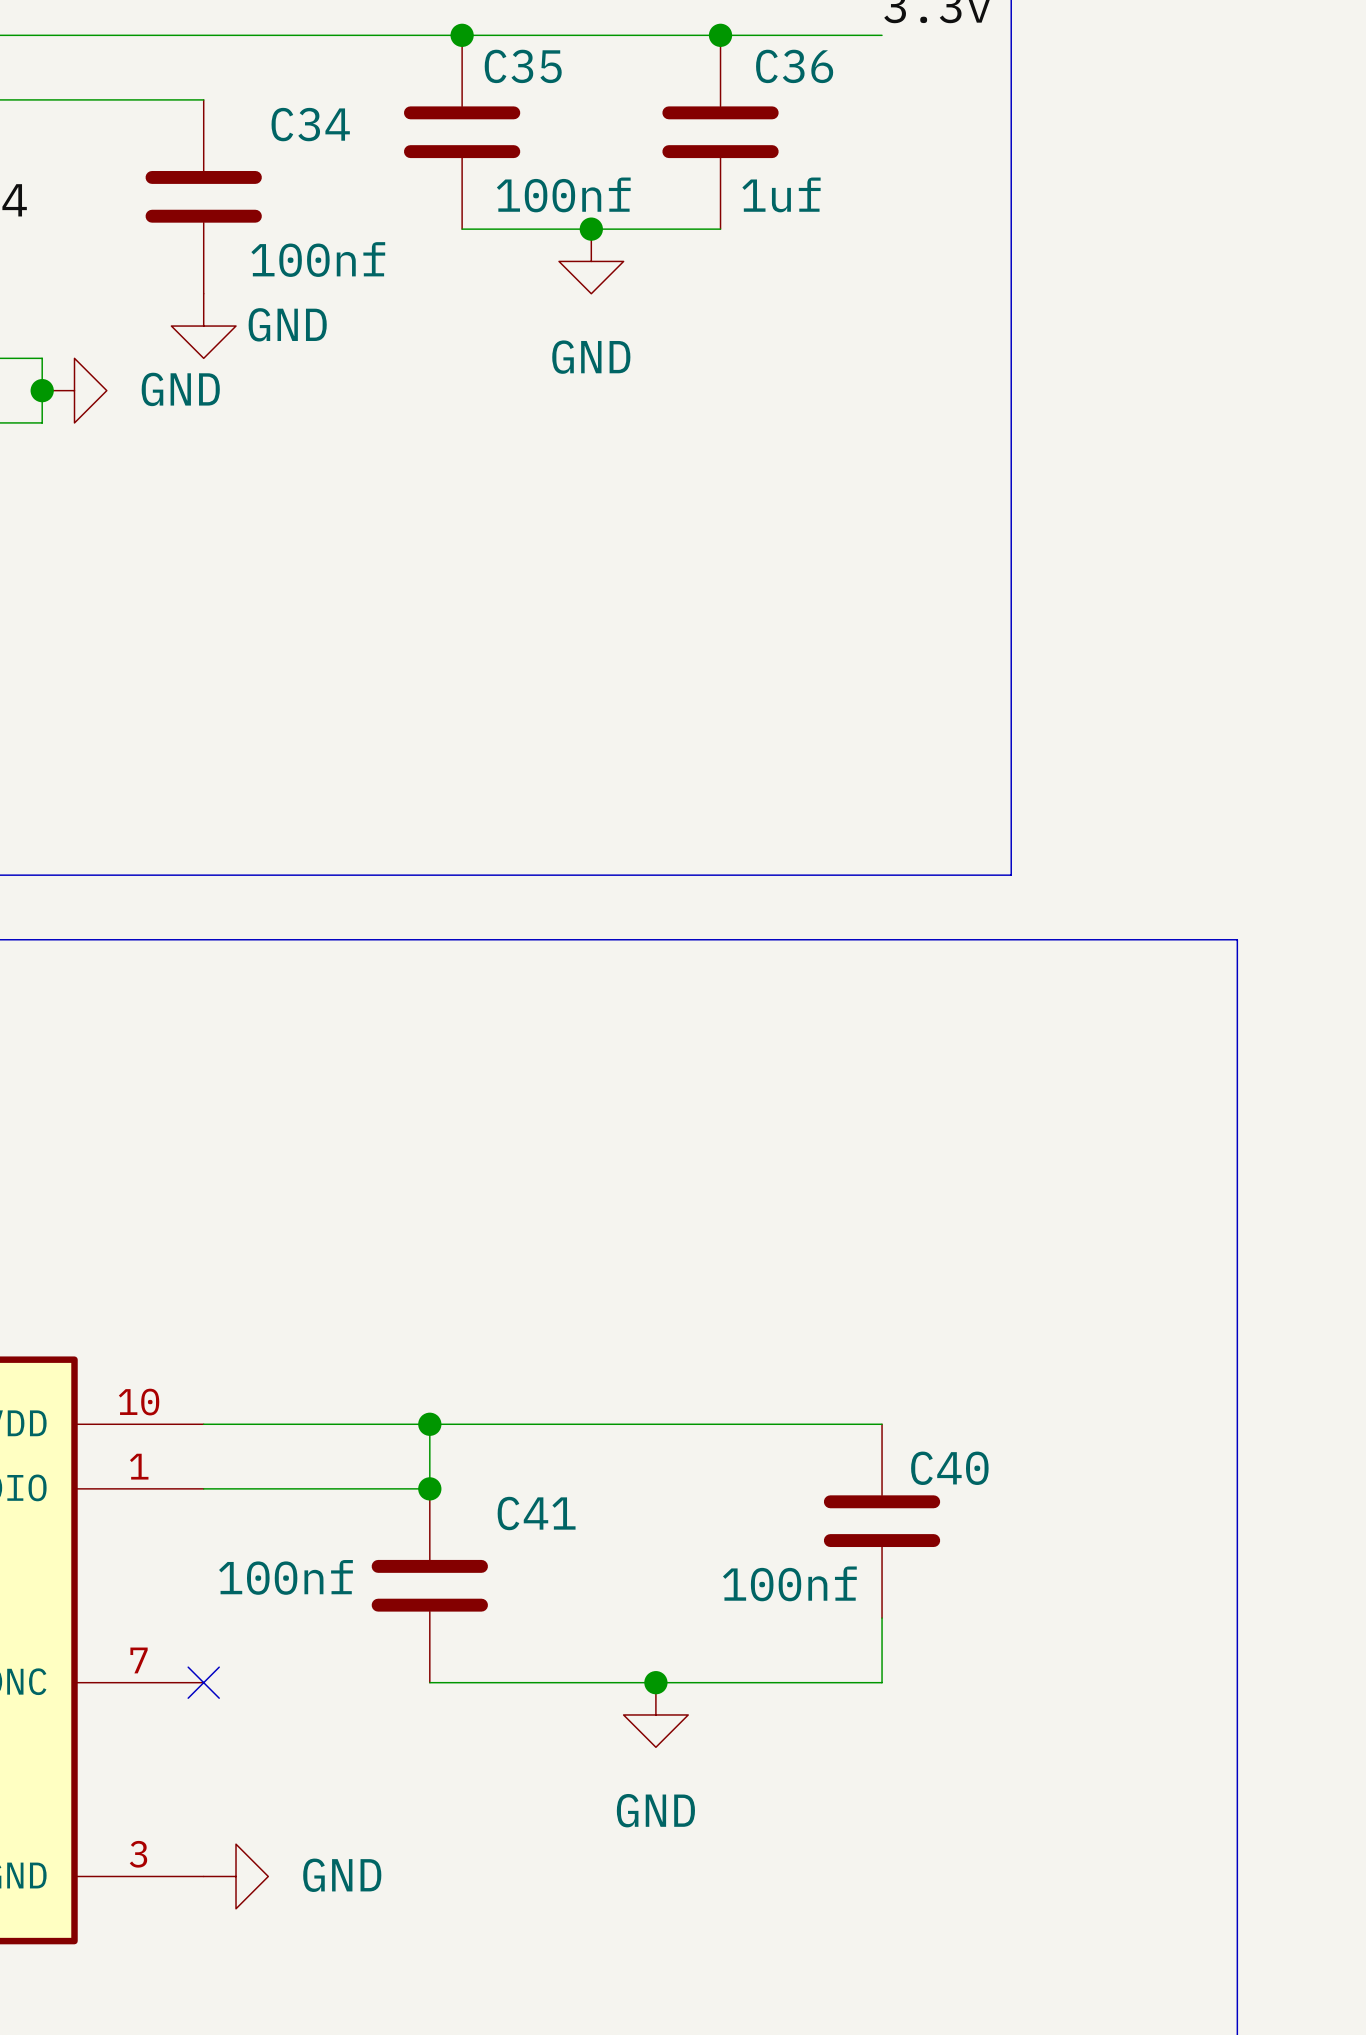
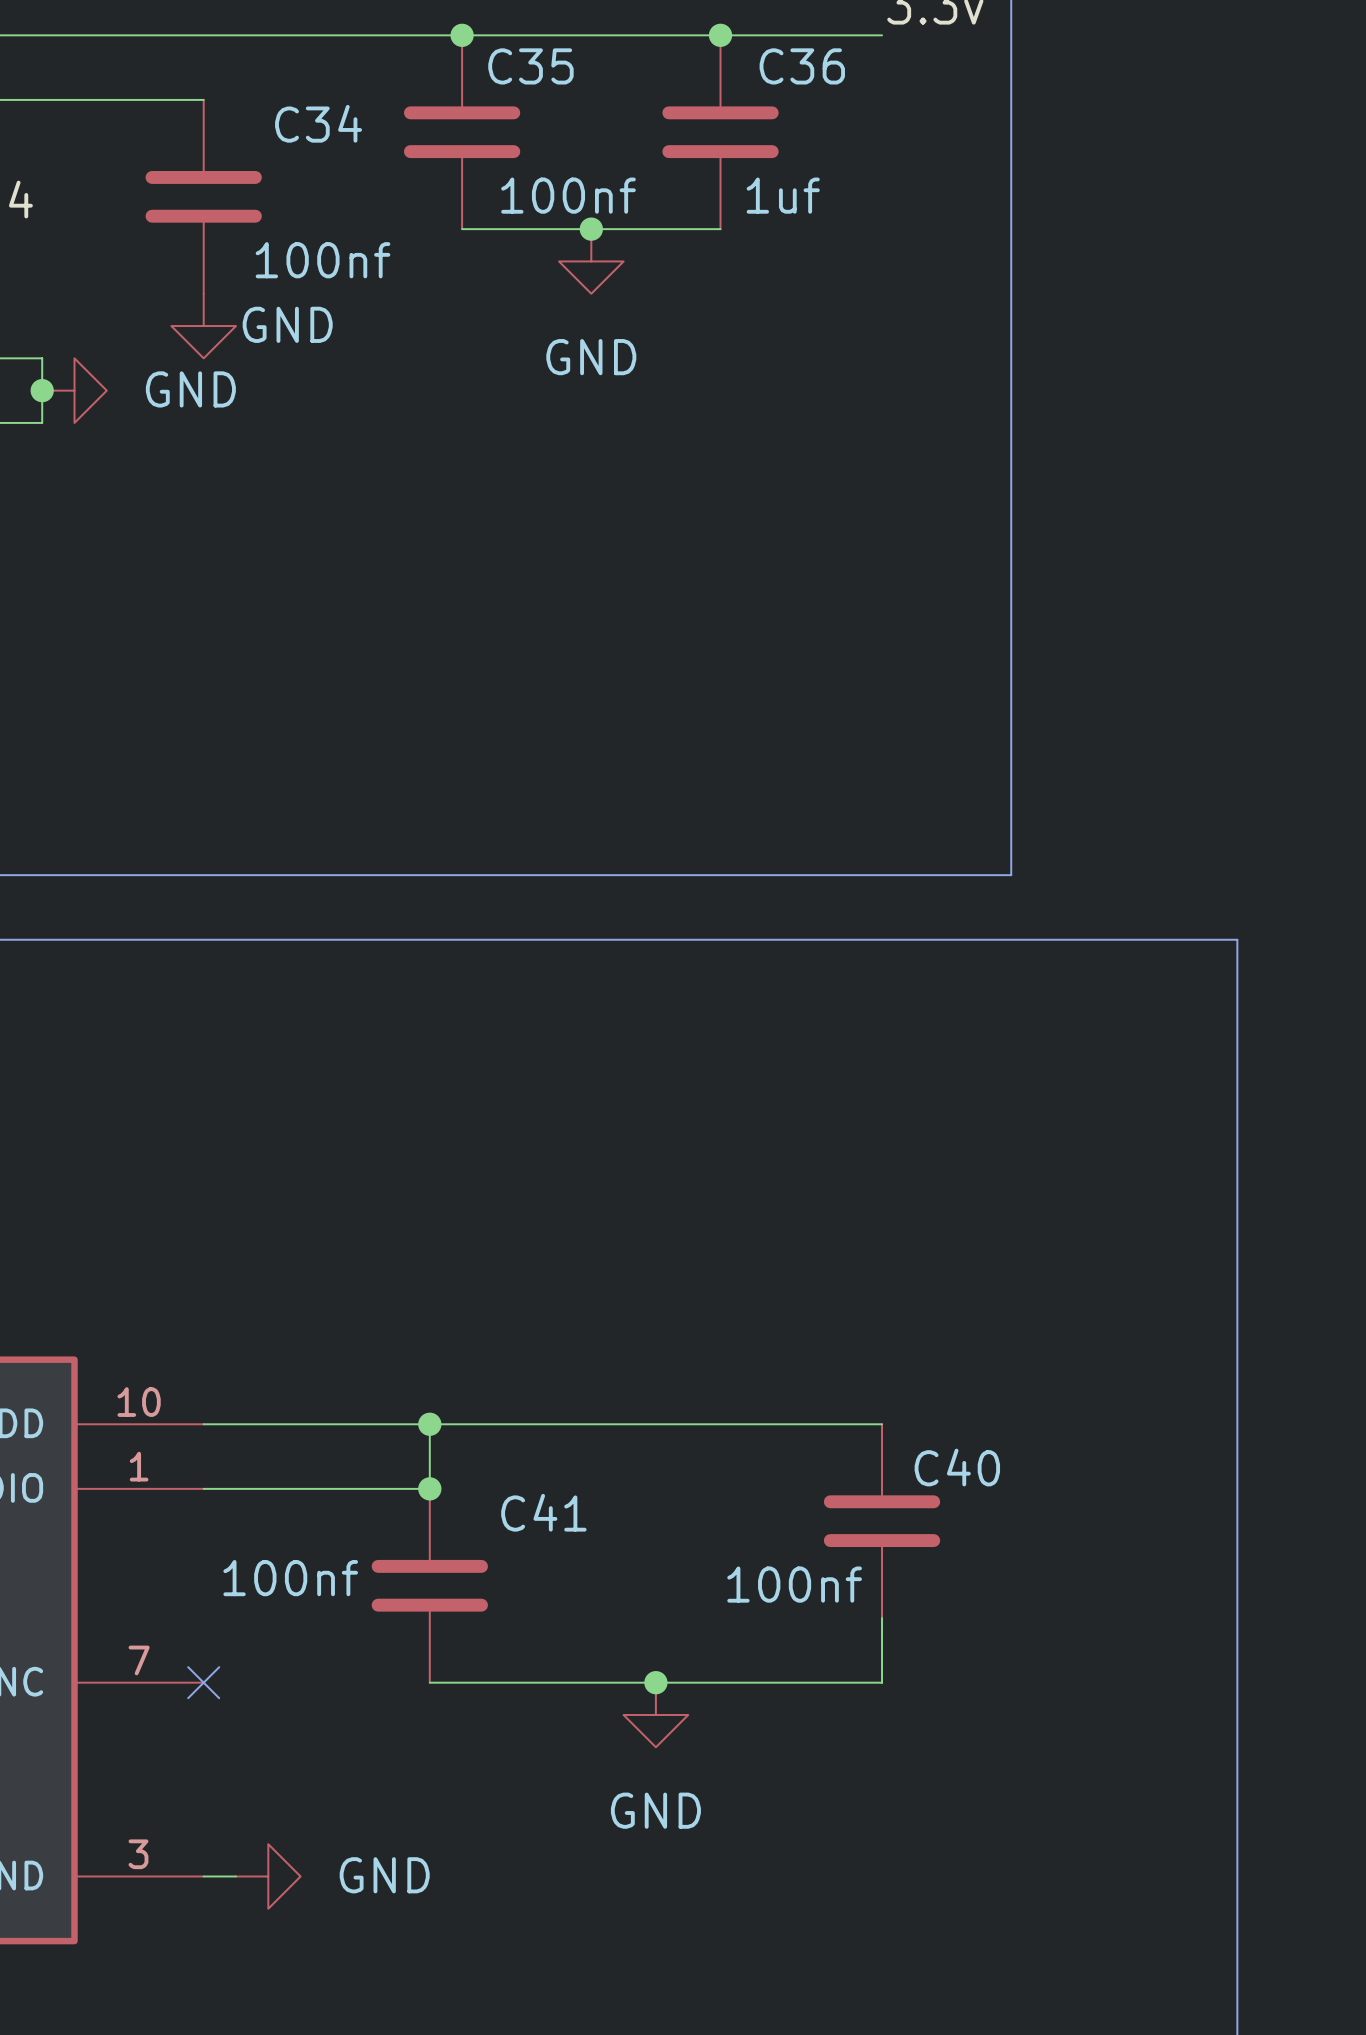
power symbol position: GND (236, 1876) -> GND (268, 1876)

